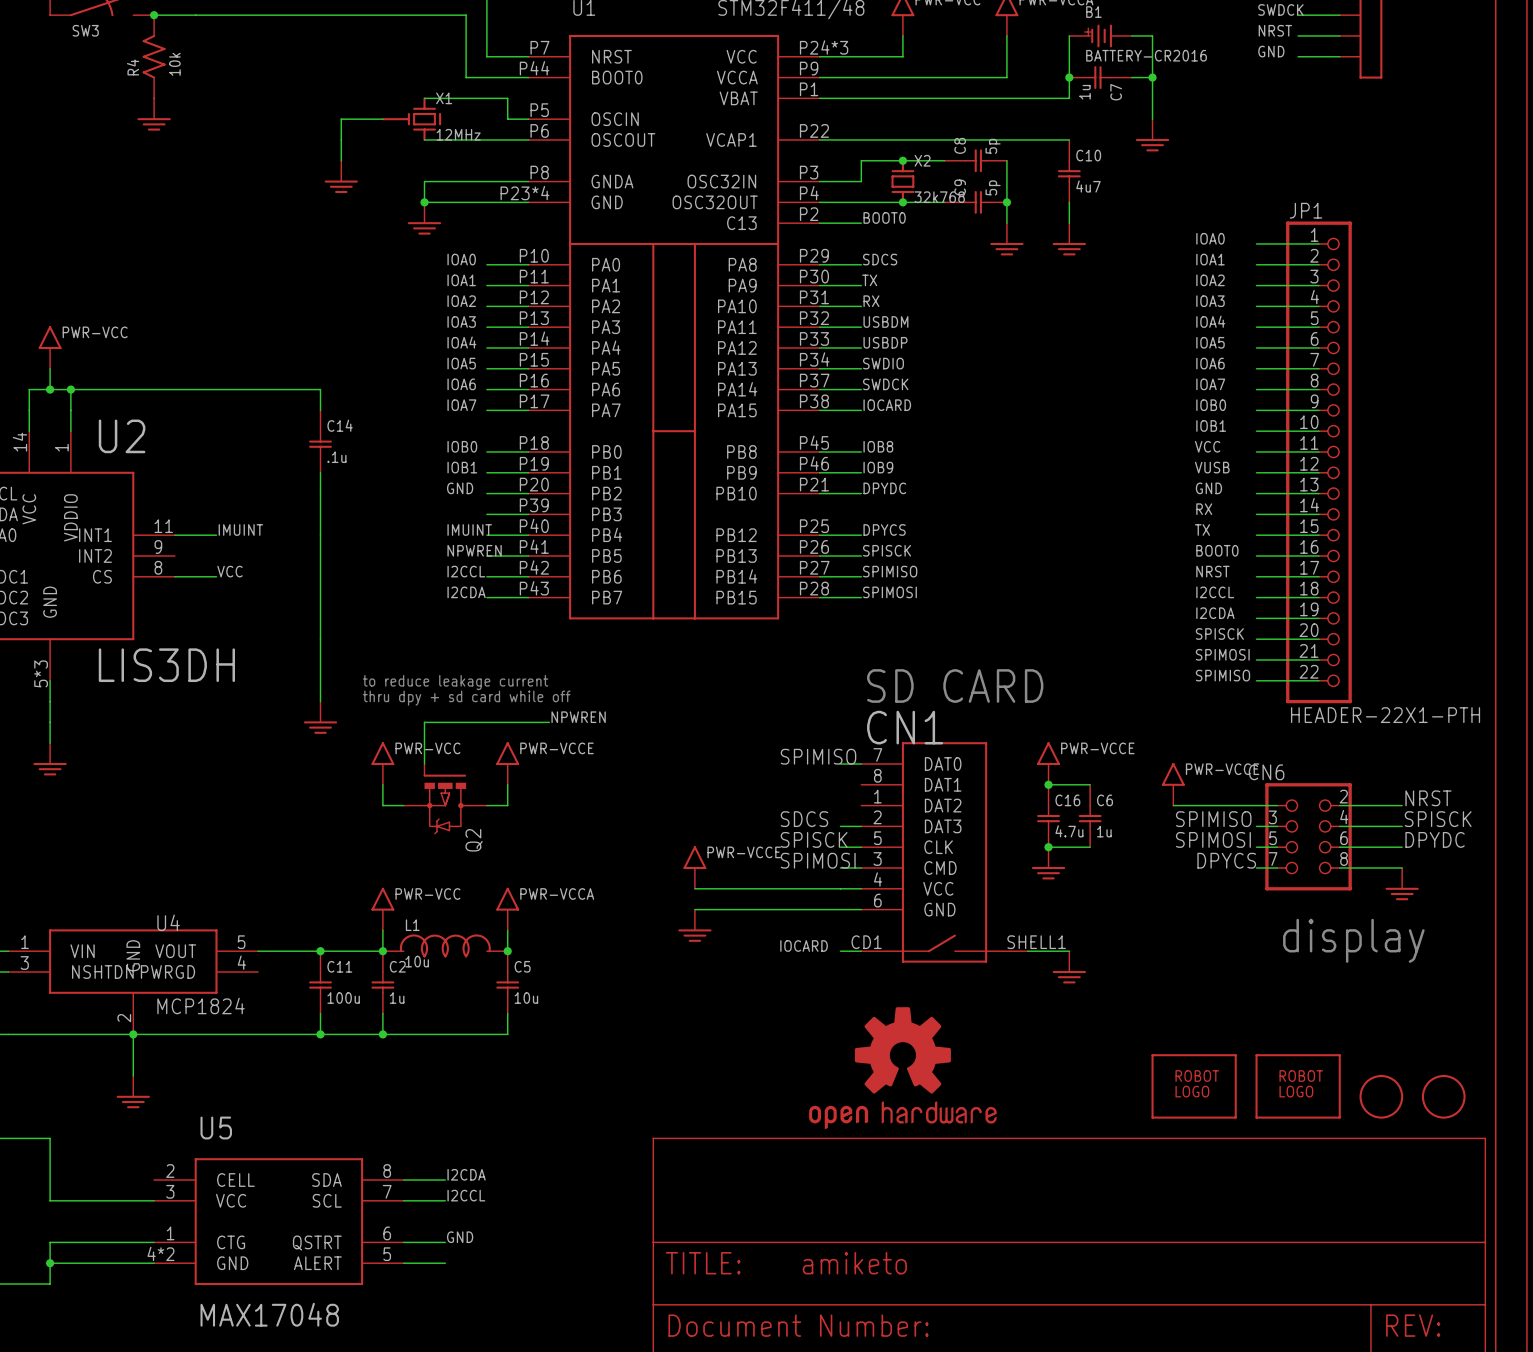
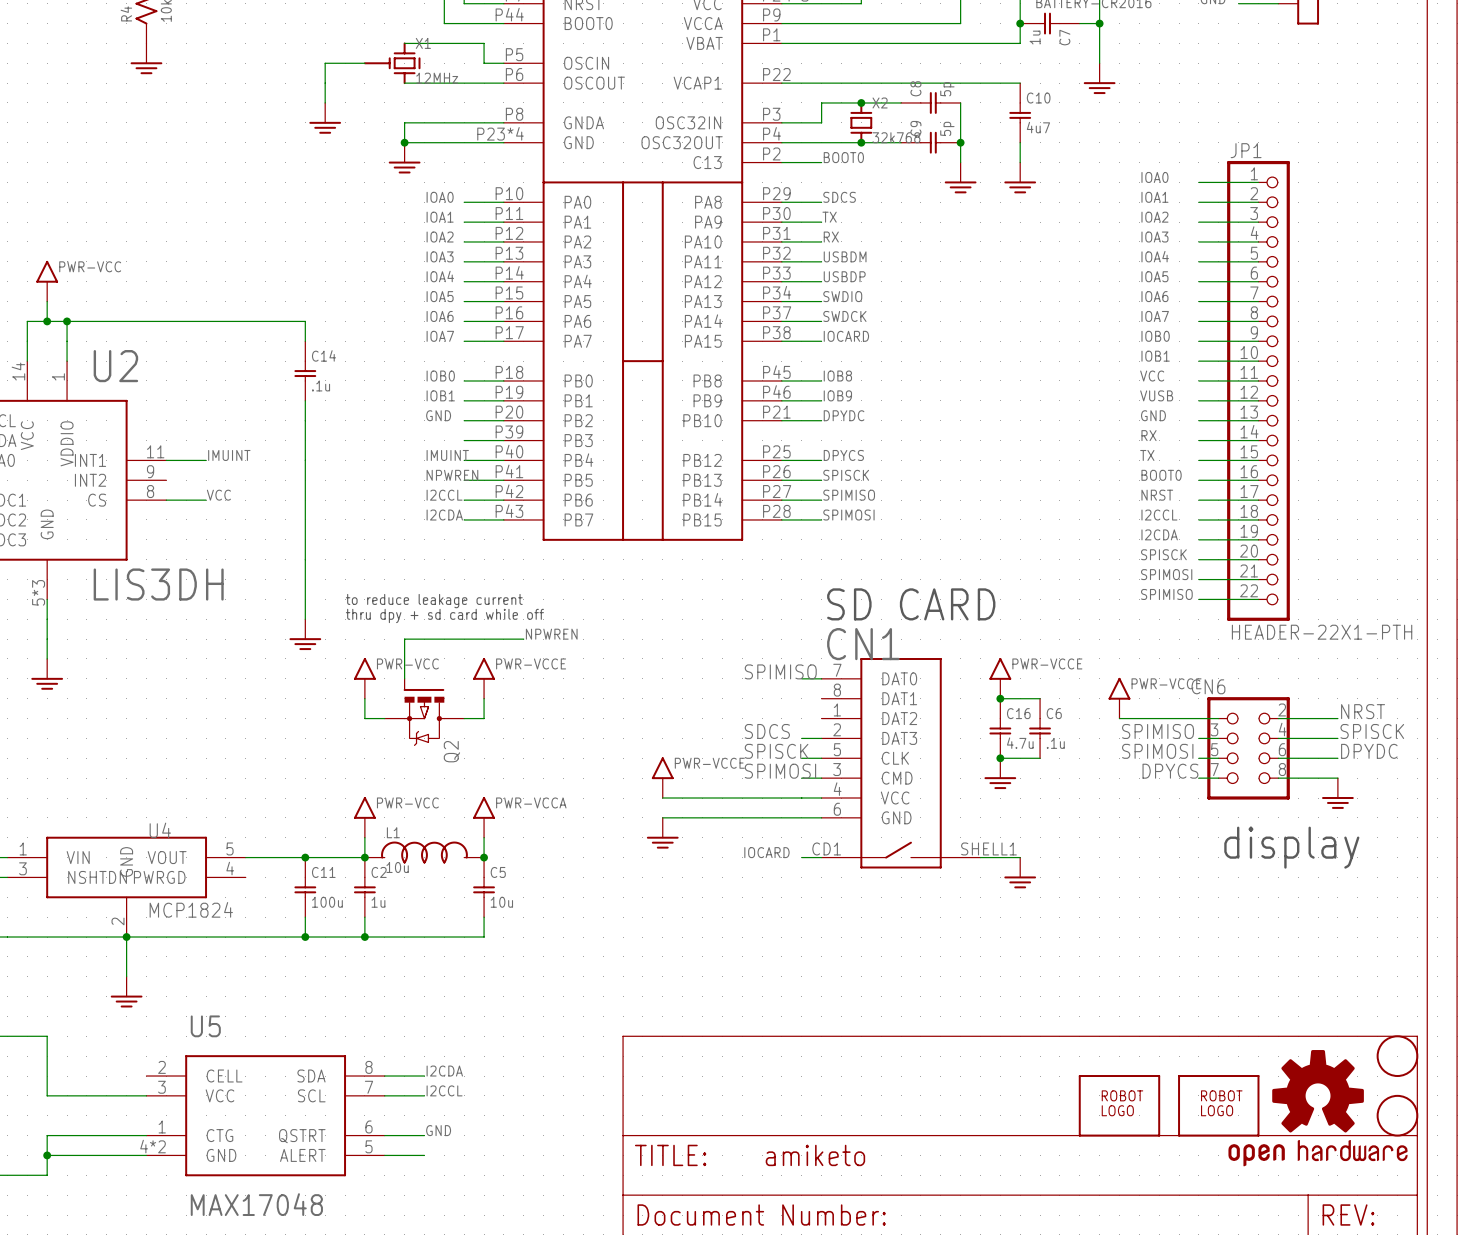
C6 value: 1u (1104, 831) -> .1u (1055, 743)
part: (902, 1068) -> none
part: (1194, 1086) -> none
part: (1298, 1086) -> none
part: (1381, 1096) -> none
part: (1443, 1096) -> none
part: none -> (1397, 1056)
part: none -> (1119, 1105)
part: none -> (1218, 1105)
part: none -> (1318, 1108)
part: none -> (1397, 1115)

